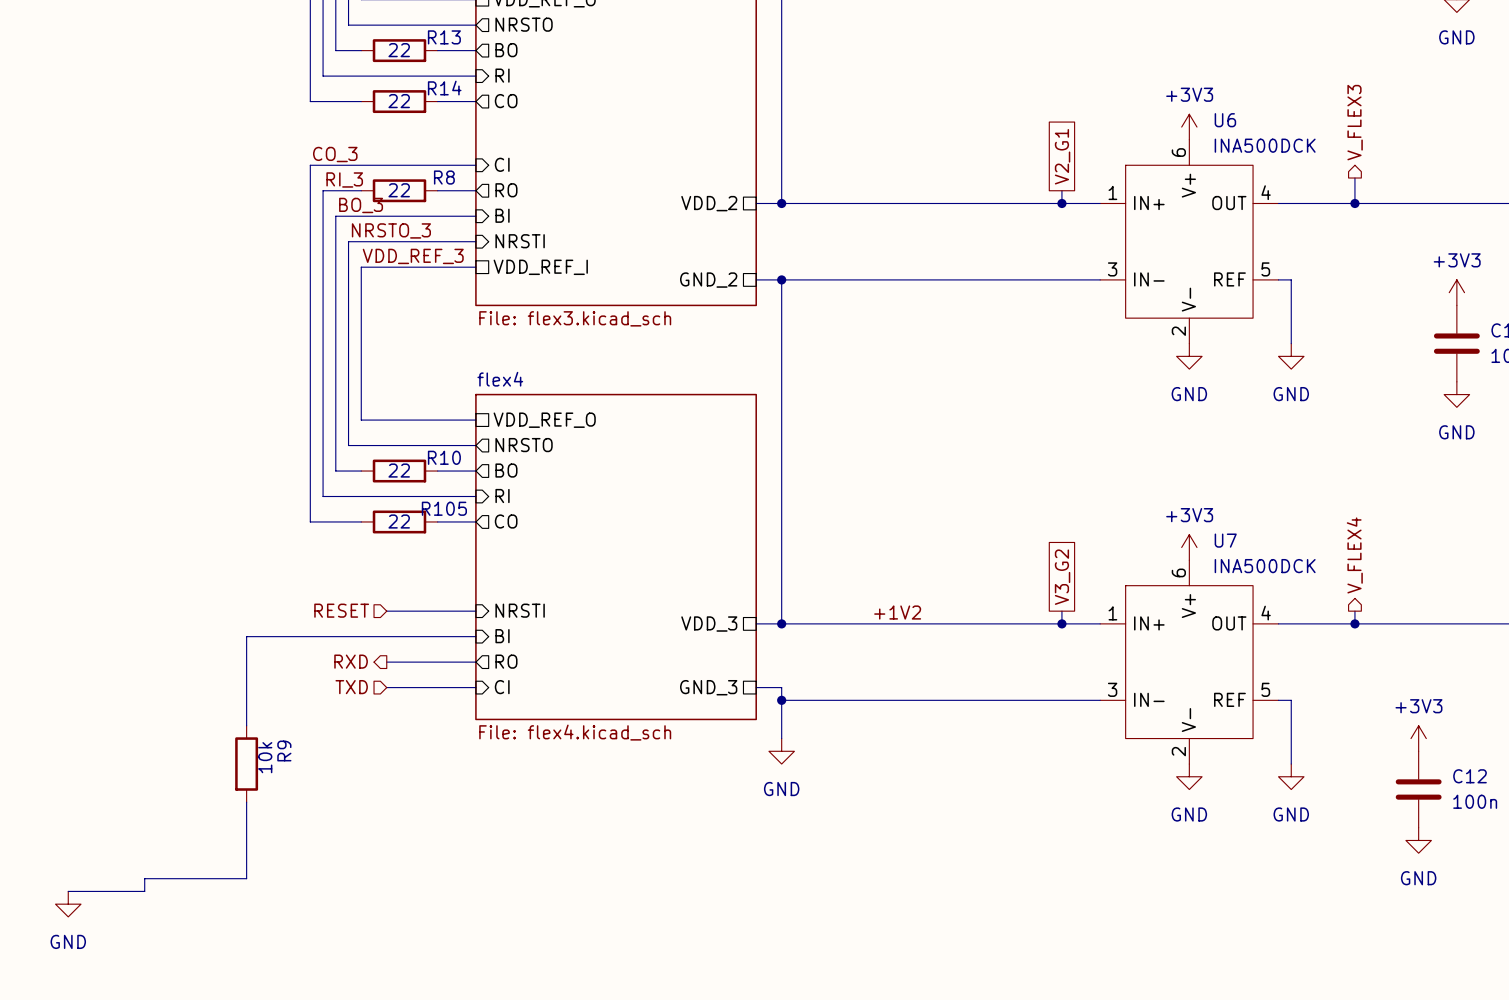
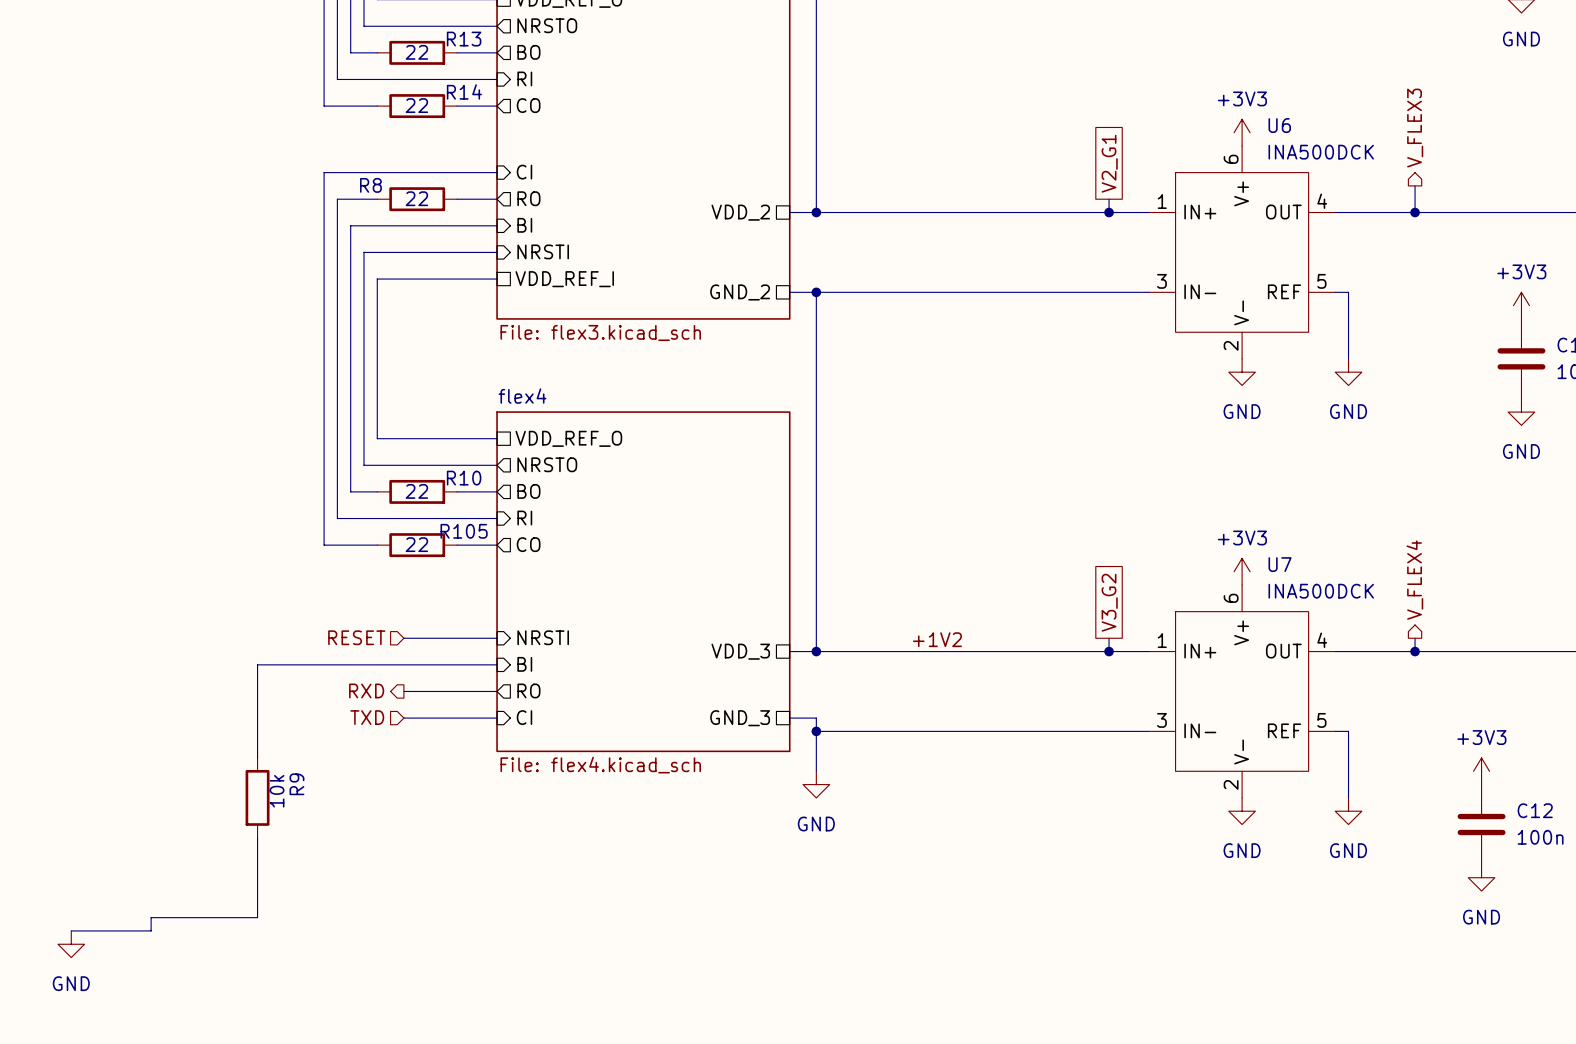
label: CO_3 (335, 154) -> none
R8 name position: R8 (444, 177) -> R8 (370, 185)
label: RI_3 (344, 179) -> none
label: BO_3 (361, 205) -> none
label: NRSTO_3 (391, 230) -> none
label: VDD_REF_3 (413, 256) -> none

